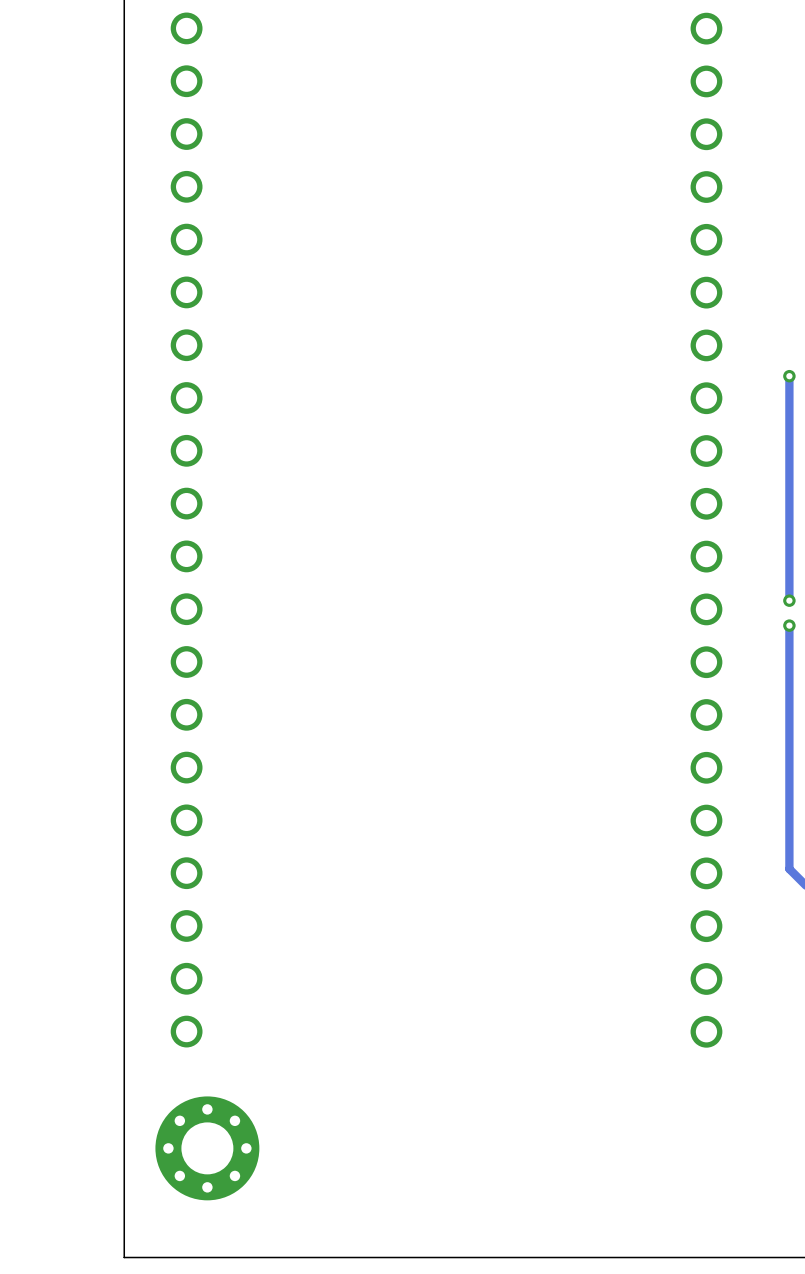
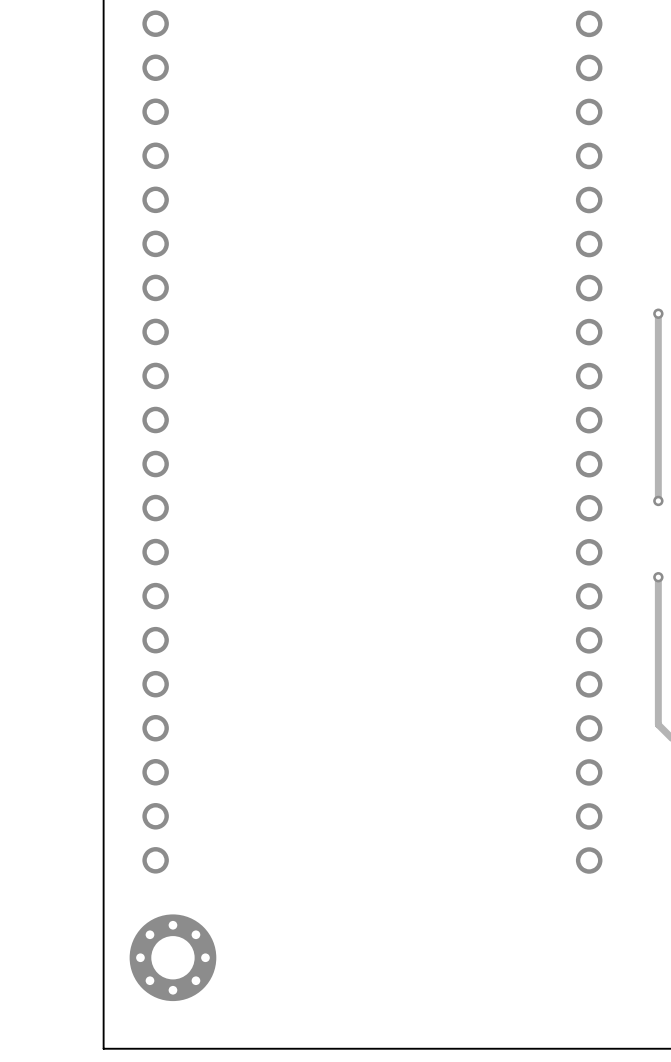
track: (789, 625) (789, 692) -> none
via position: (789, 625) -> (658, 577)

